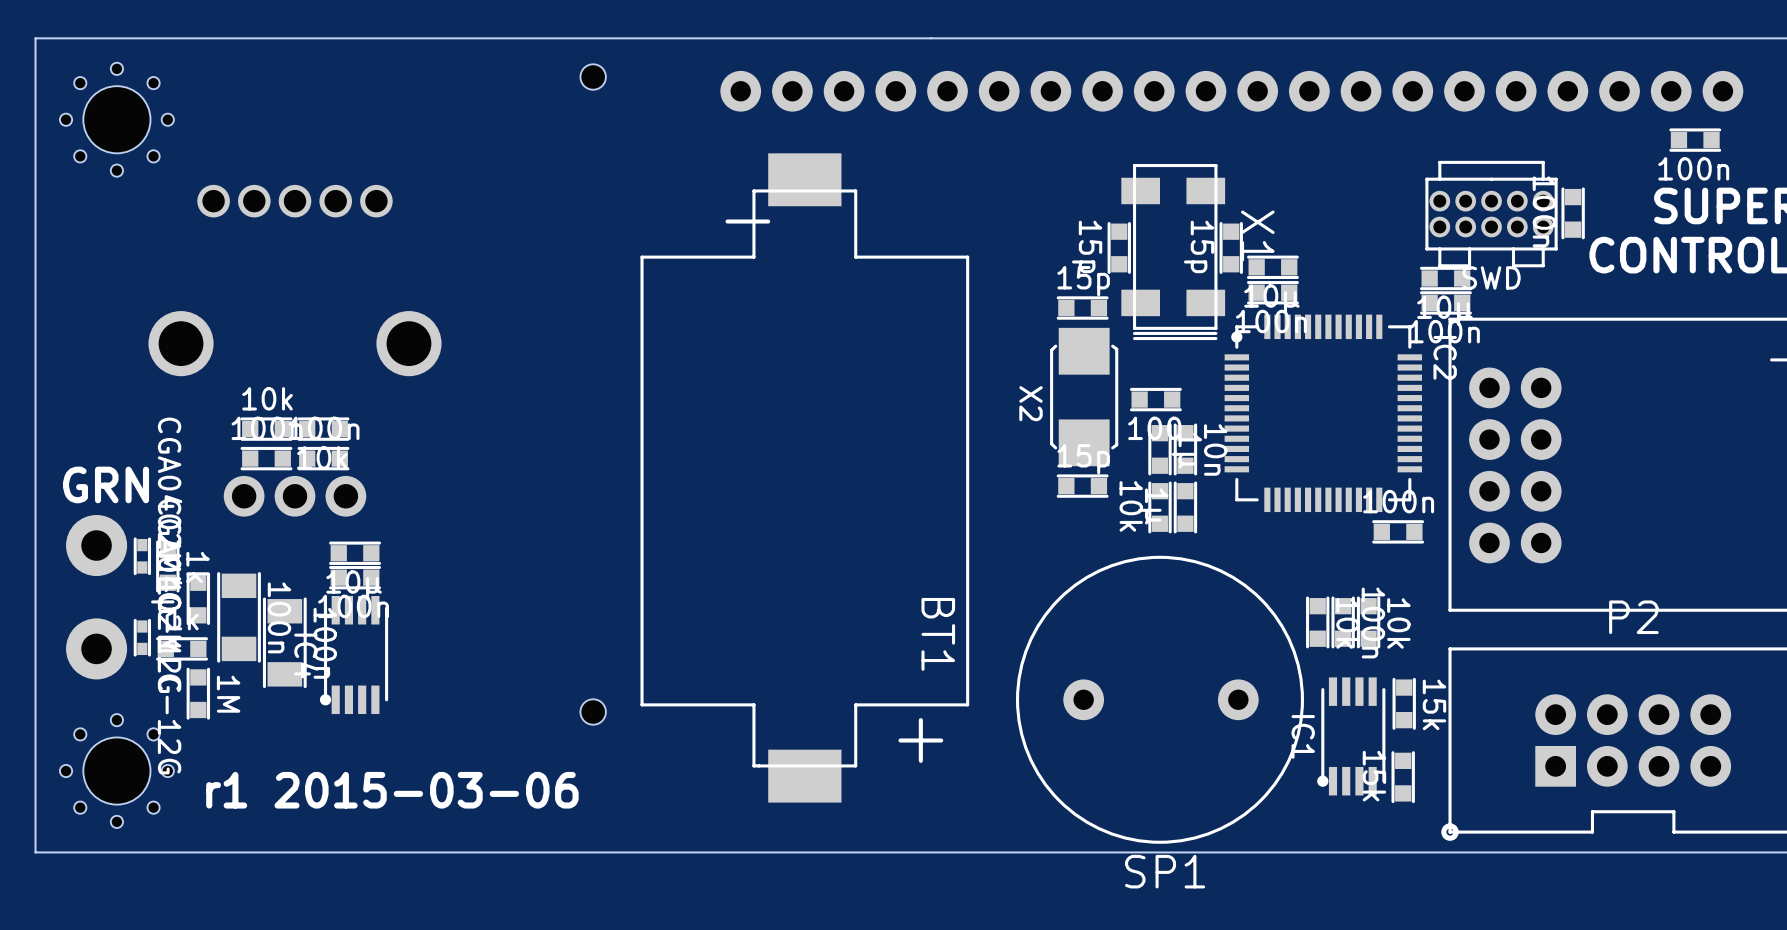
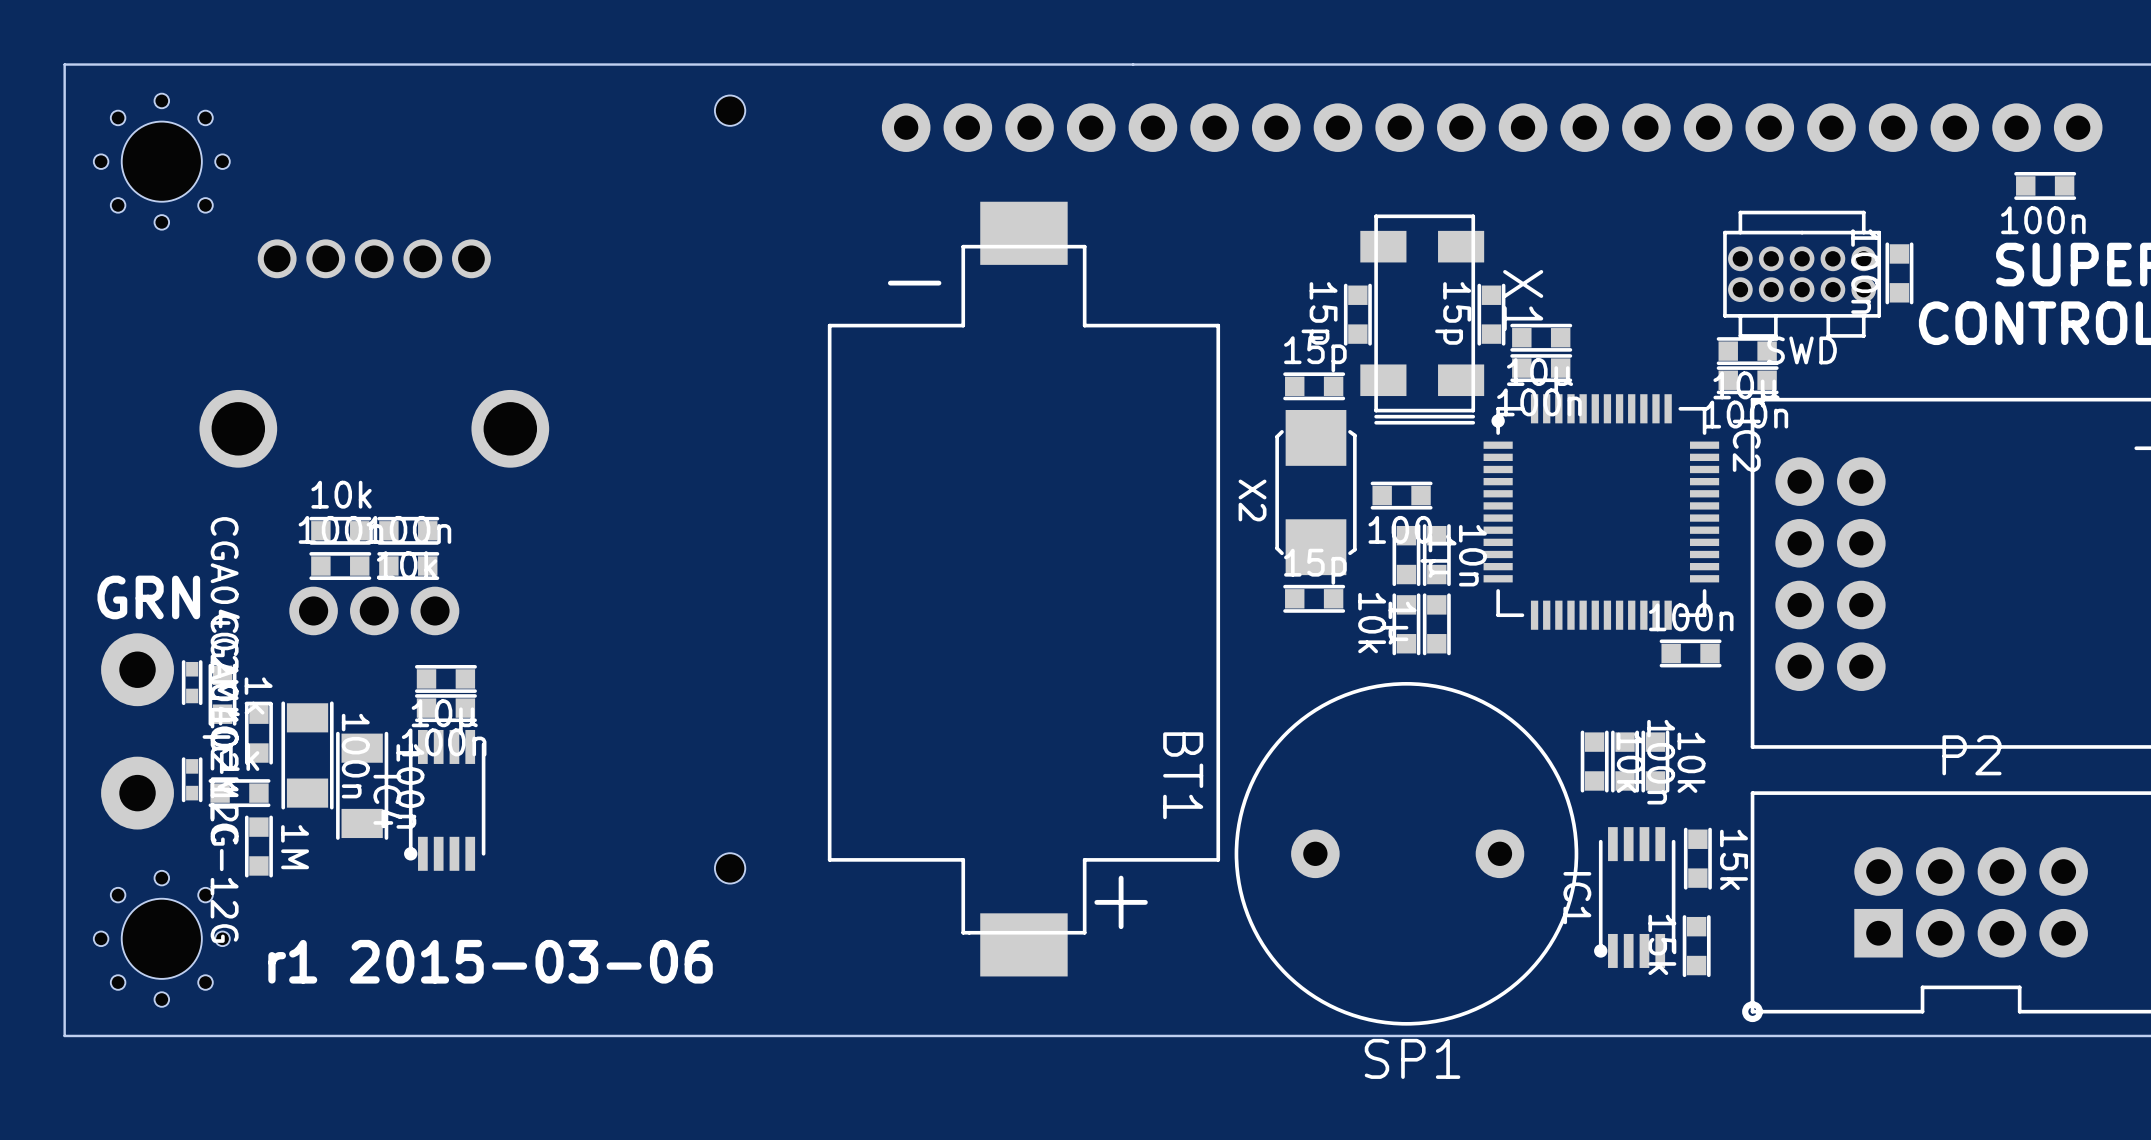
BT1 position: (804, 477) -> (1023, 589)

